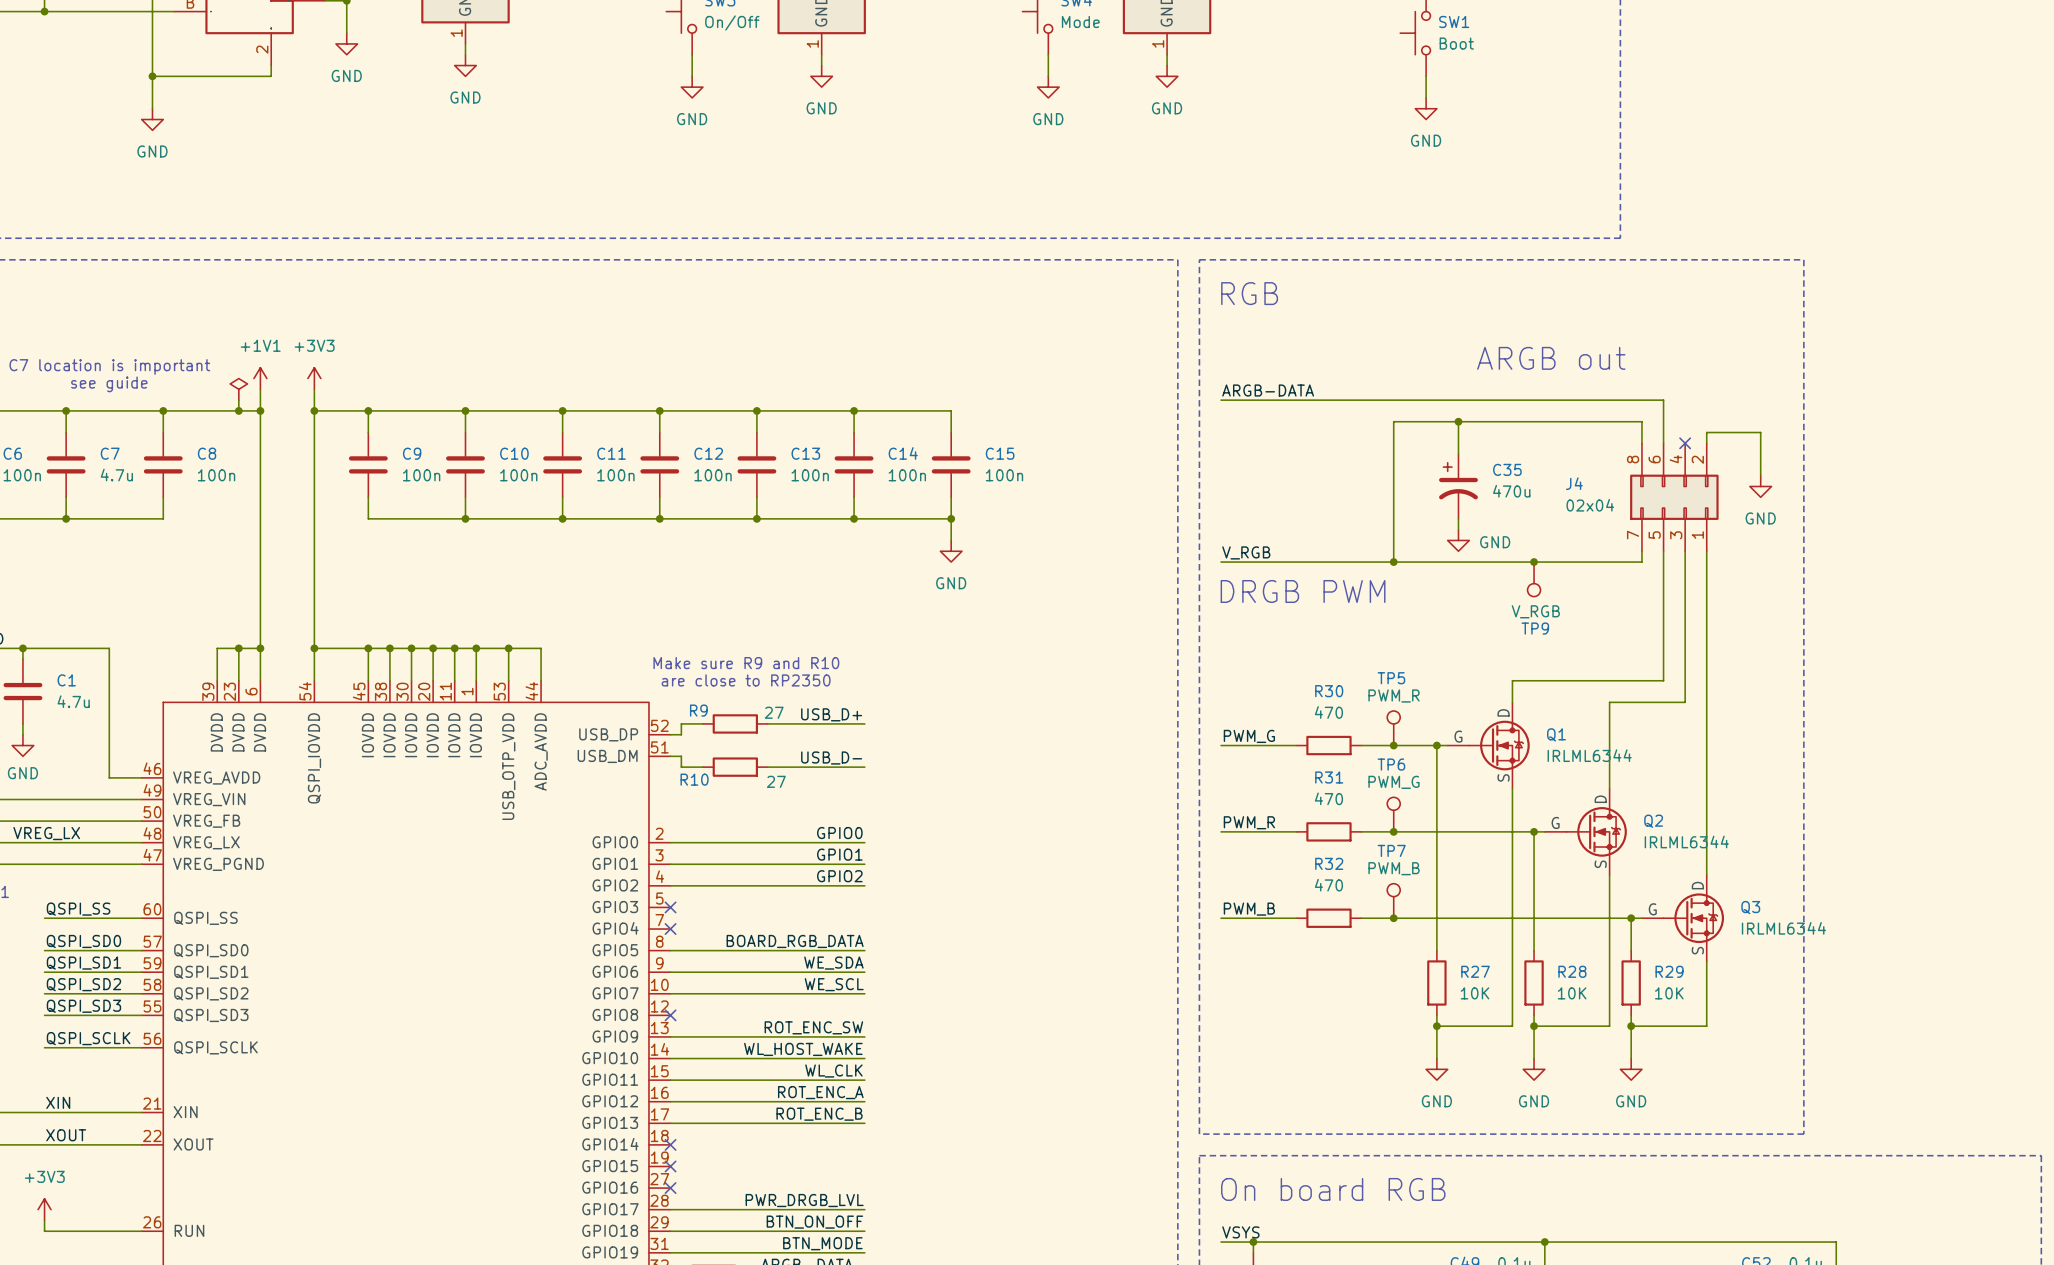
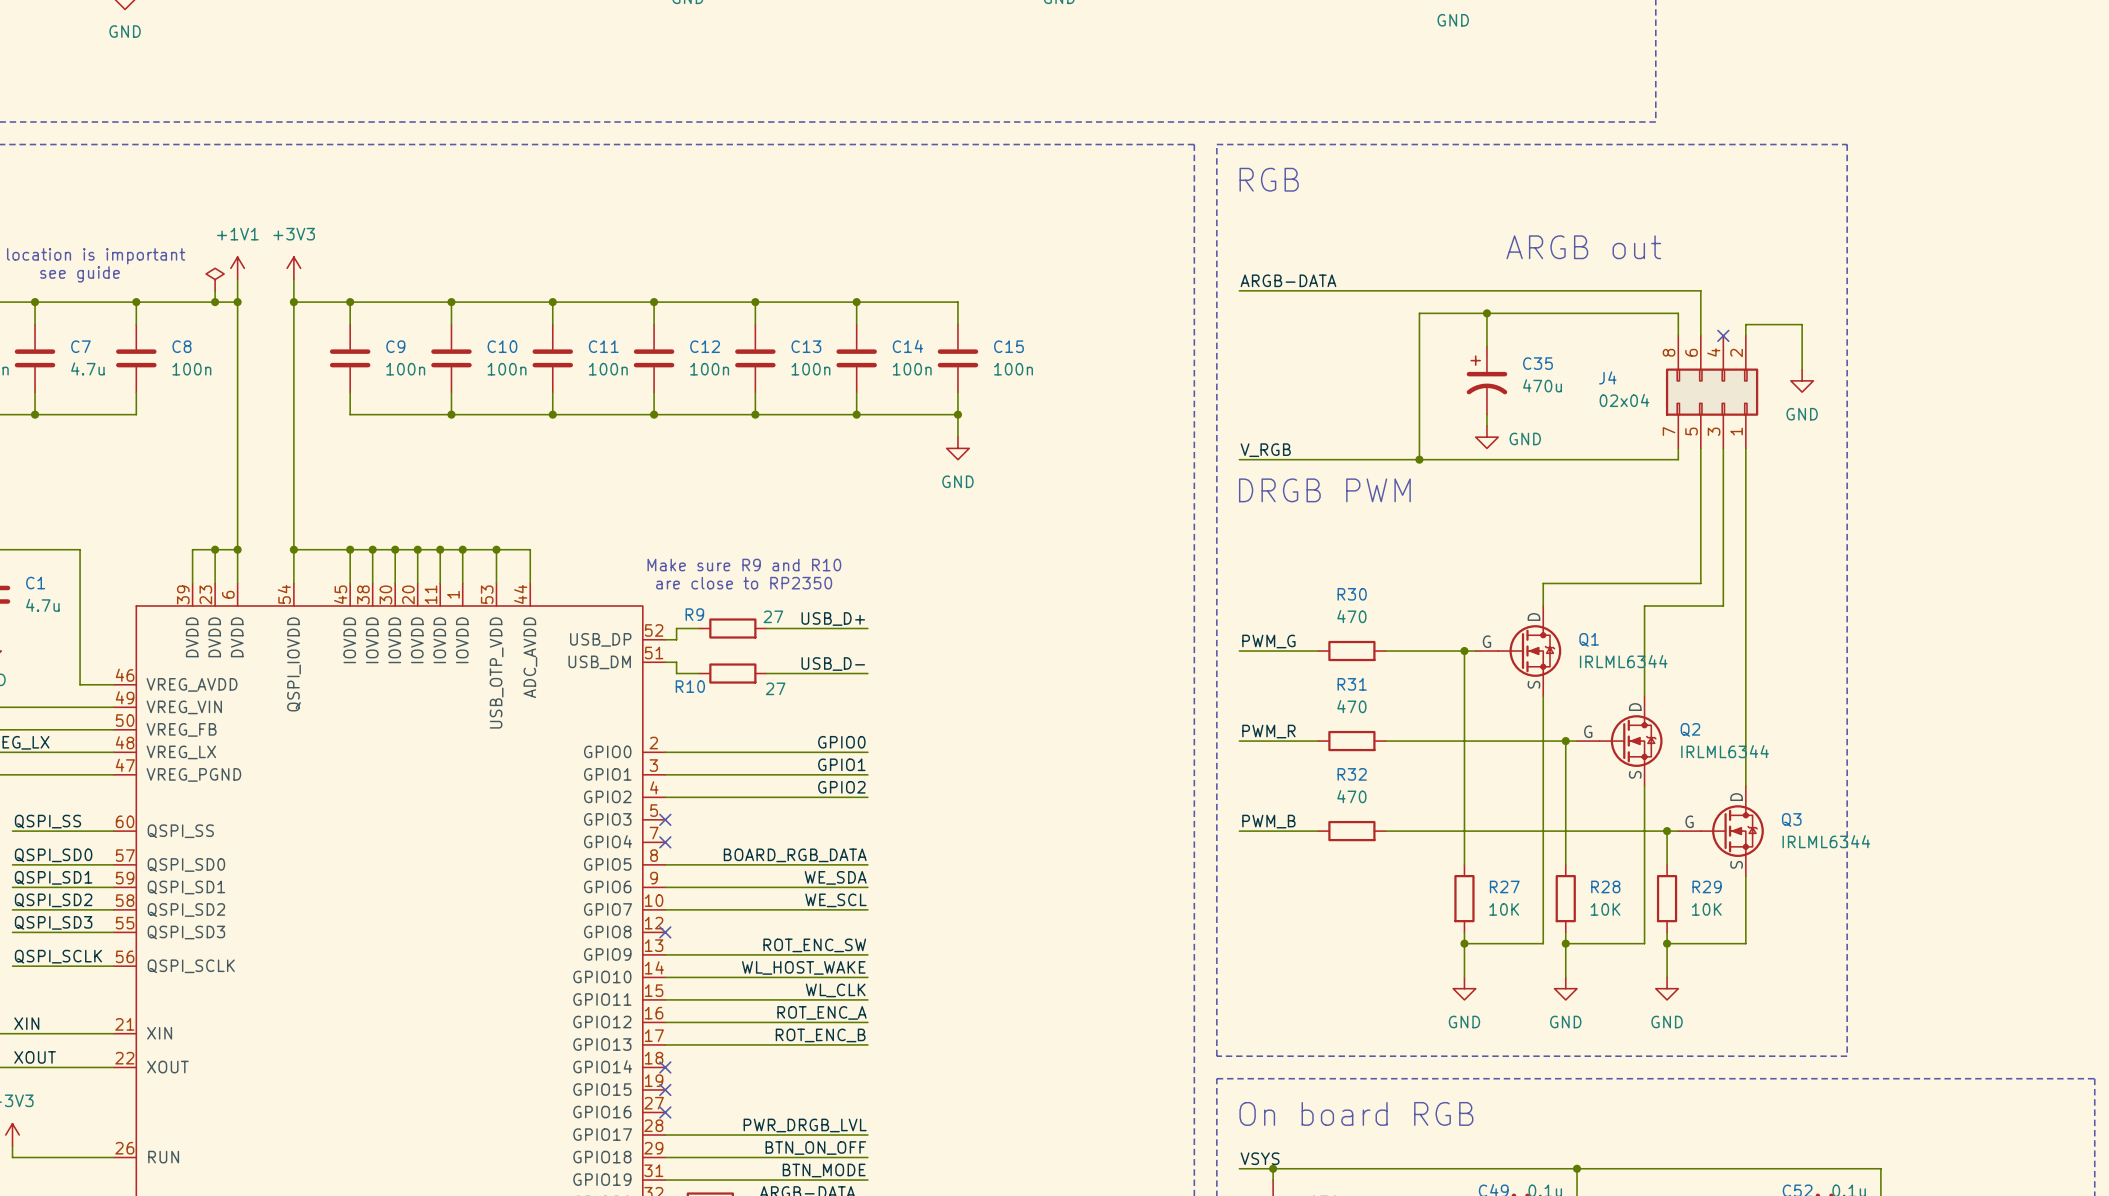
junction: (1534, 562) -> none
TP9: V_RGB (1534, 579) -> none
TP5: PWM_R (1393, 728) -> none
junction: (1393, 745) -> none
TP6: PWM_G (1393, 814) -> none
junction: (1393, 831) -> none
TP7: PWM_B (1393, 900) -> none
junction: (1393, 918) -> none

